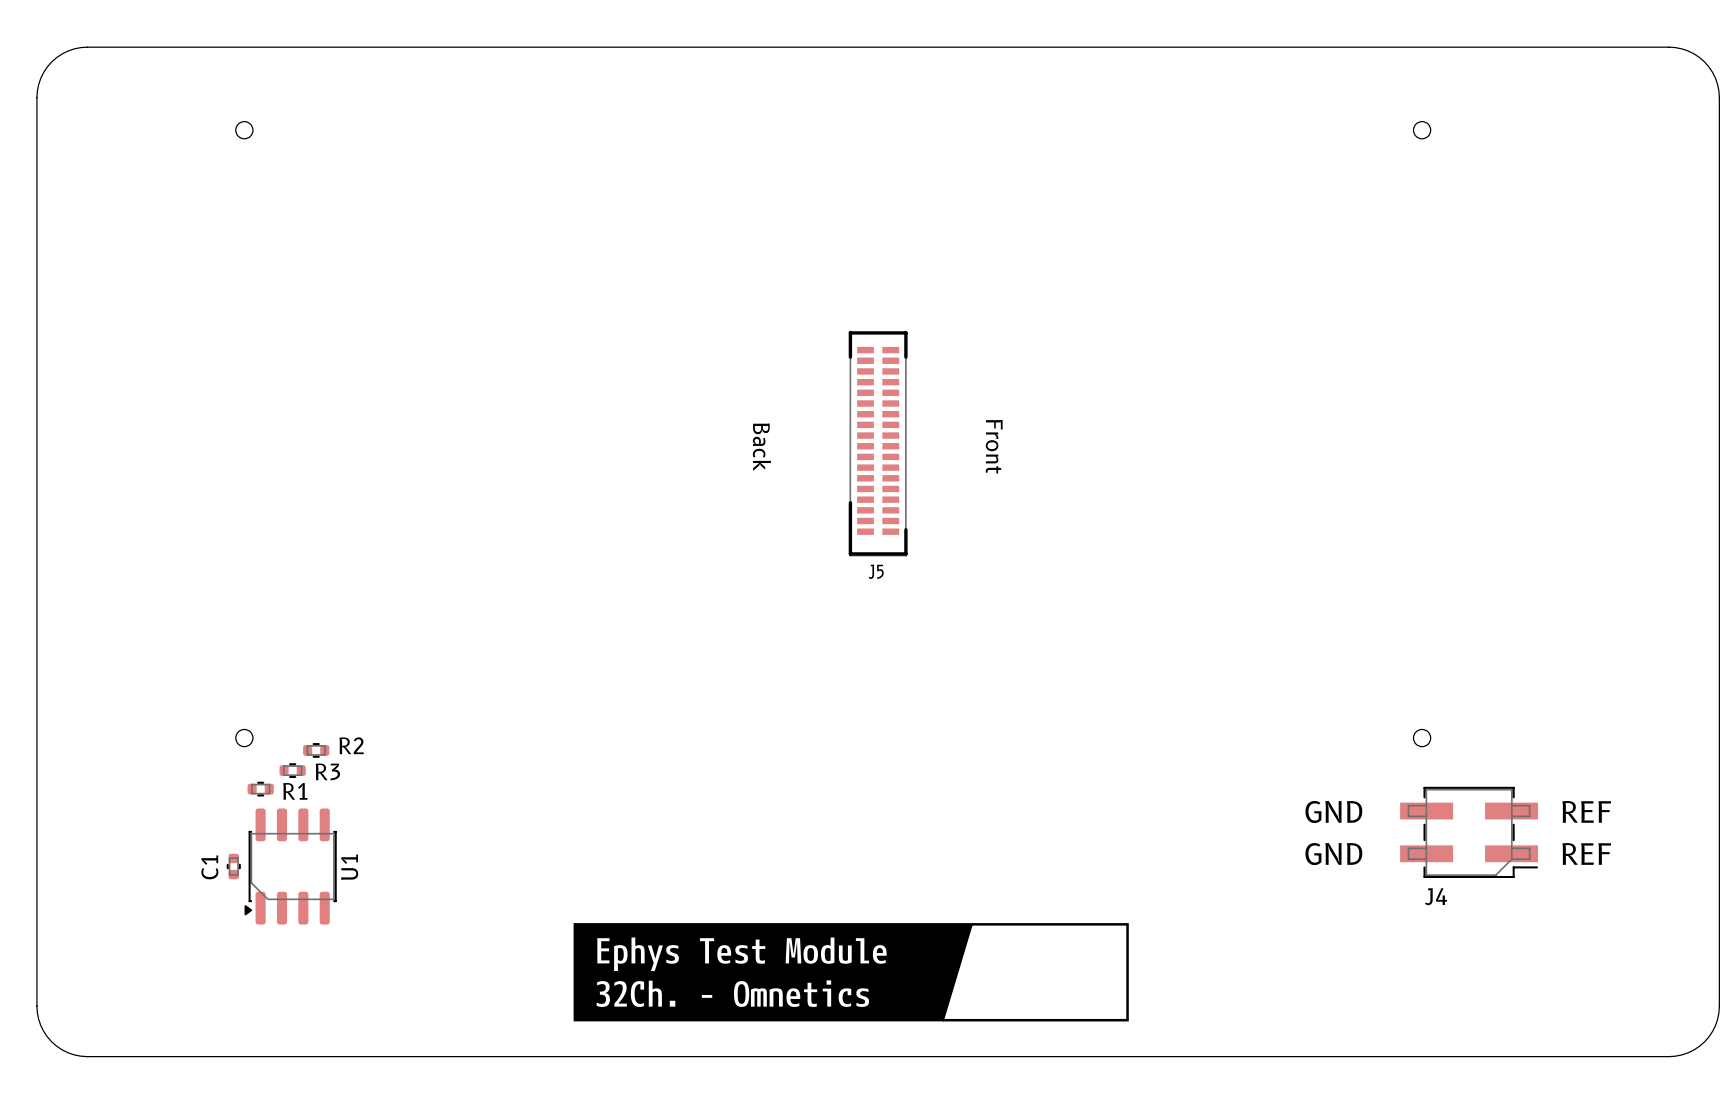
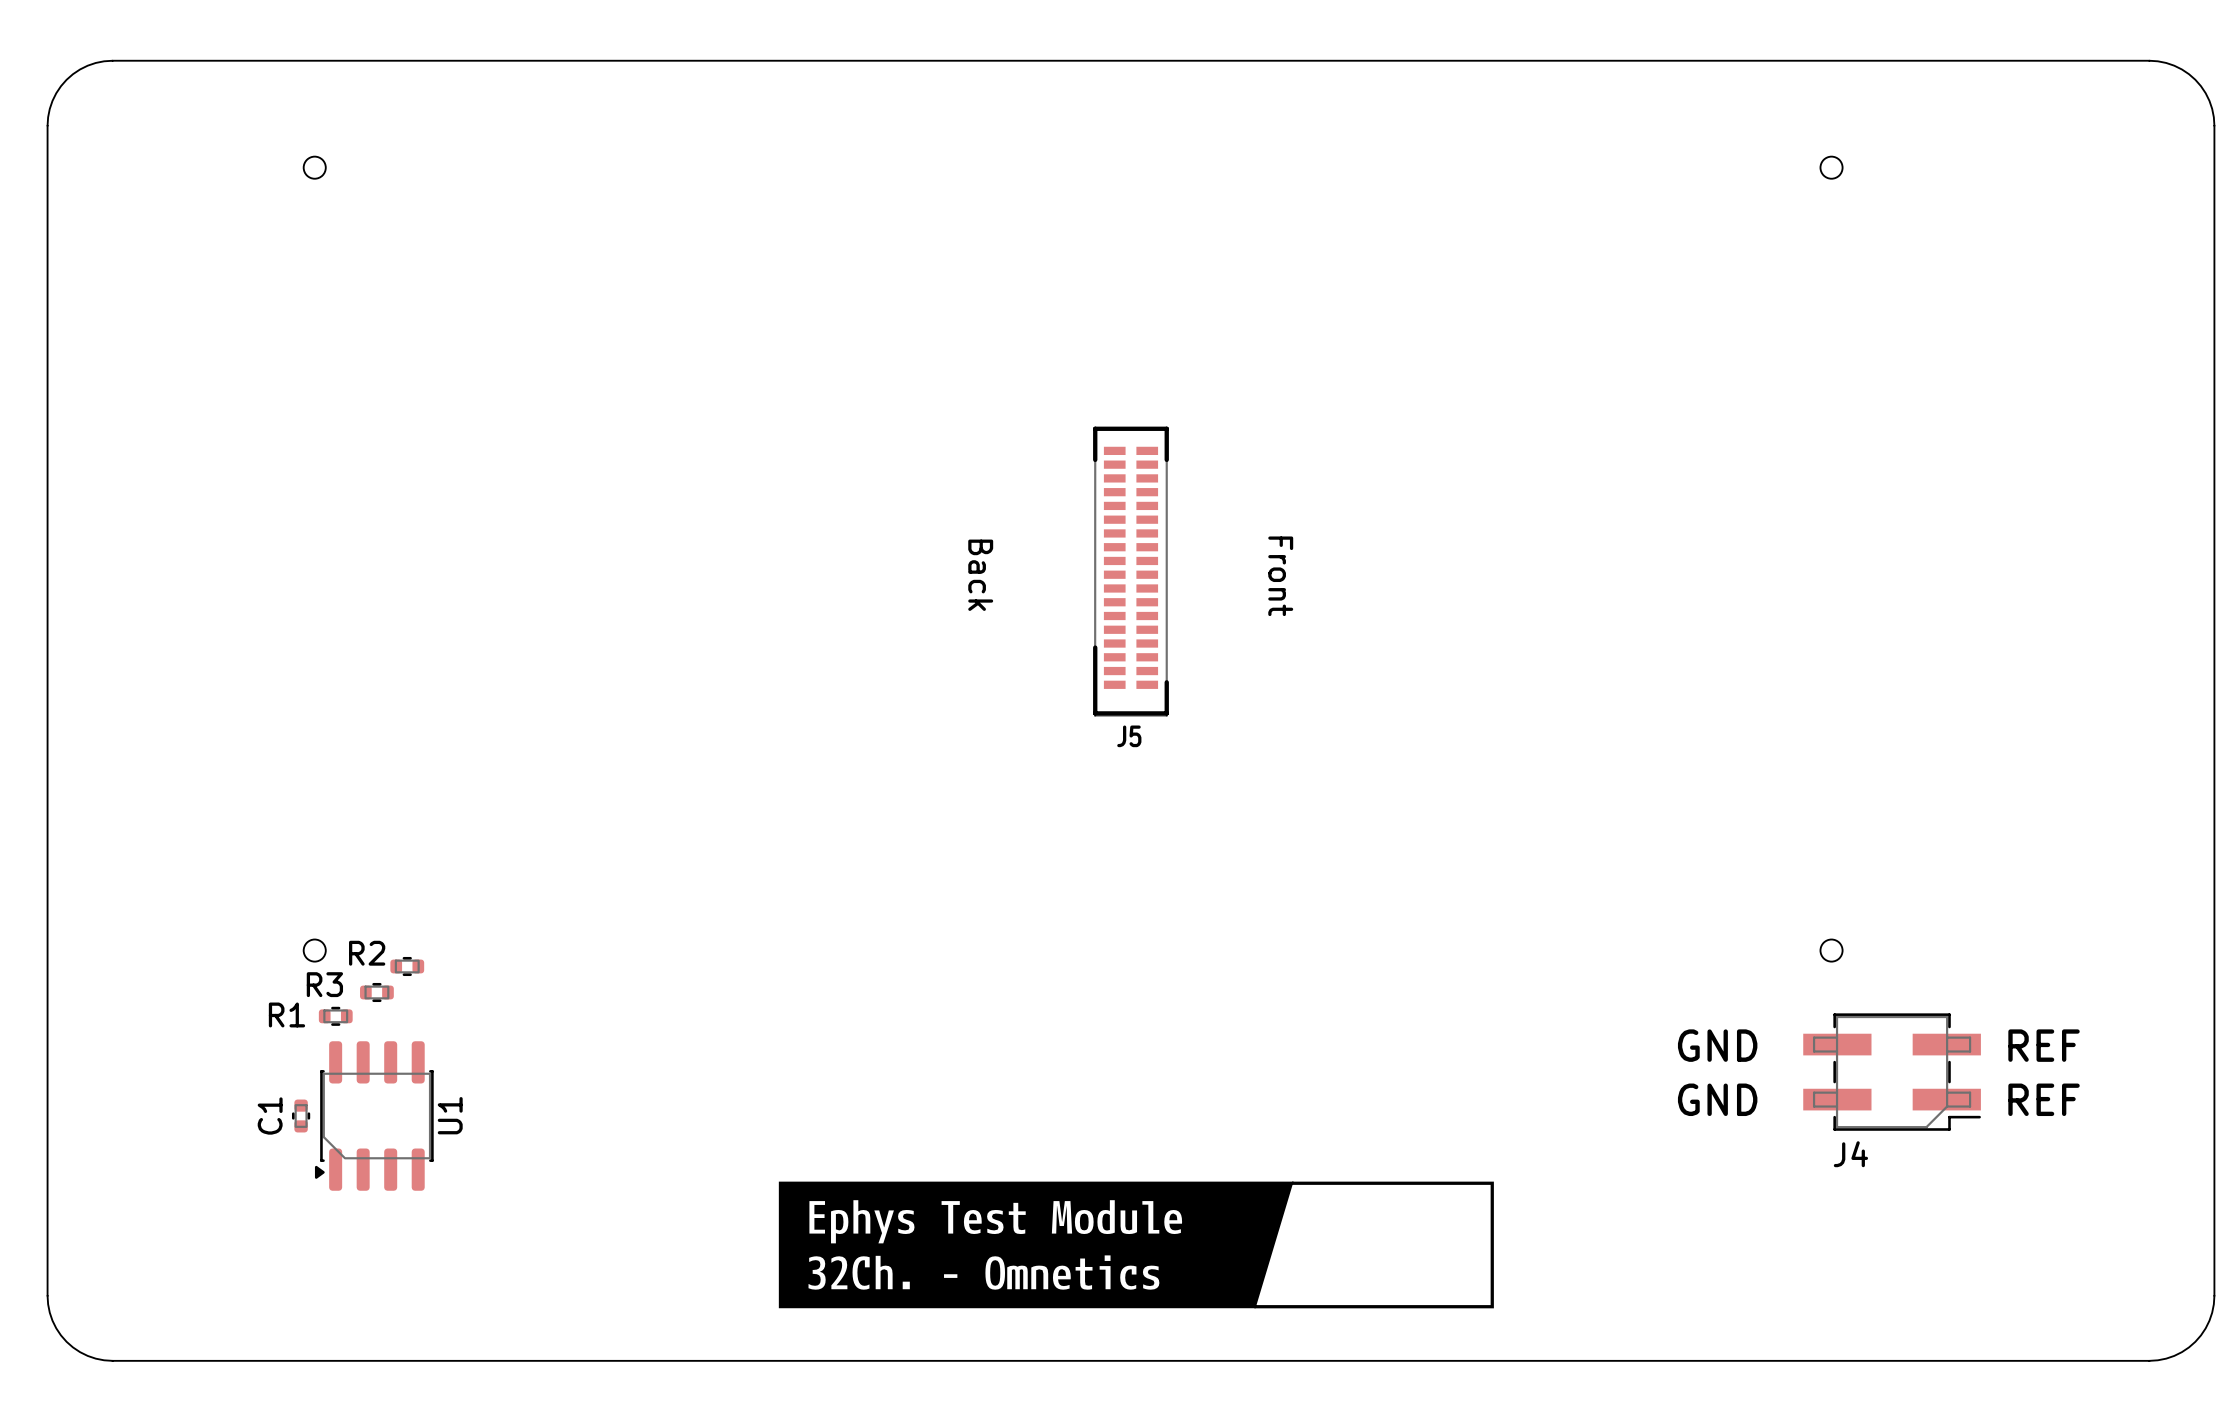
R2 name position: R2 (351, 745) -> R2 (367, 953)
R3 name position: R3 (327, 771) -> R3 (324, 984)
R1 name position: R1 (295, 791) -> R1 (286, 1014)
drawing position: (773, 972) -> (1036, 1244)
drawing position: (1035, 972) -> (1374, 1244)

